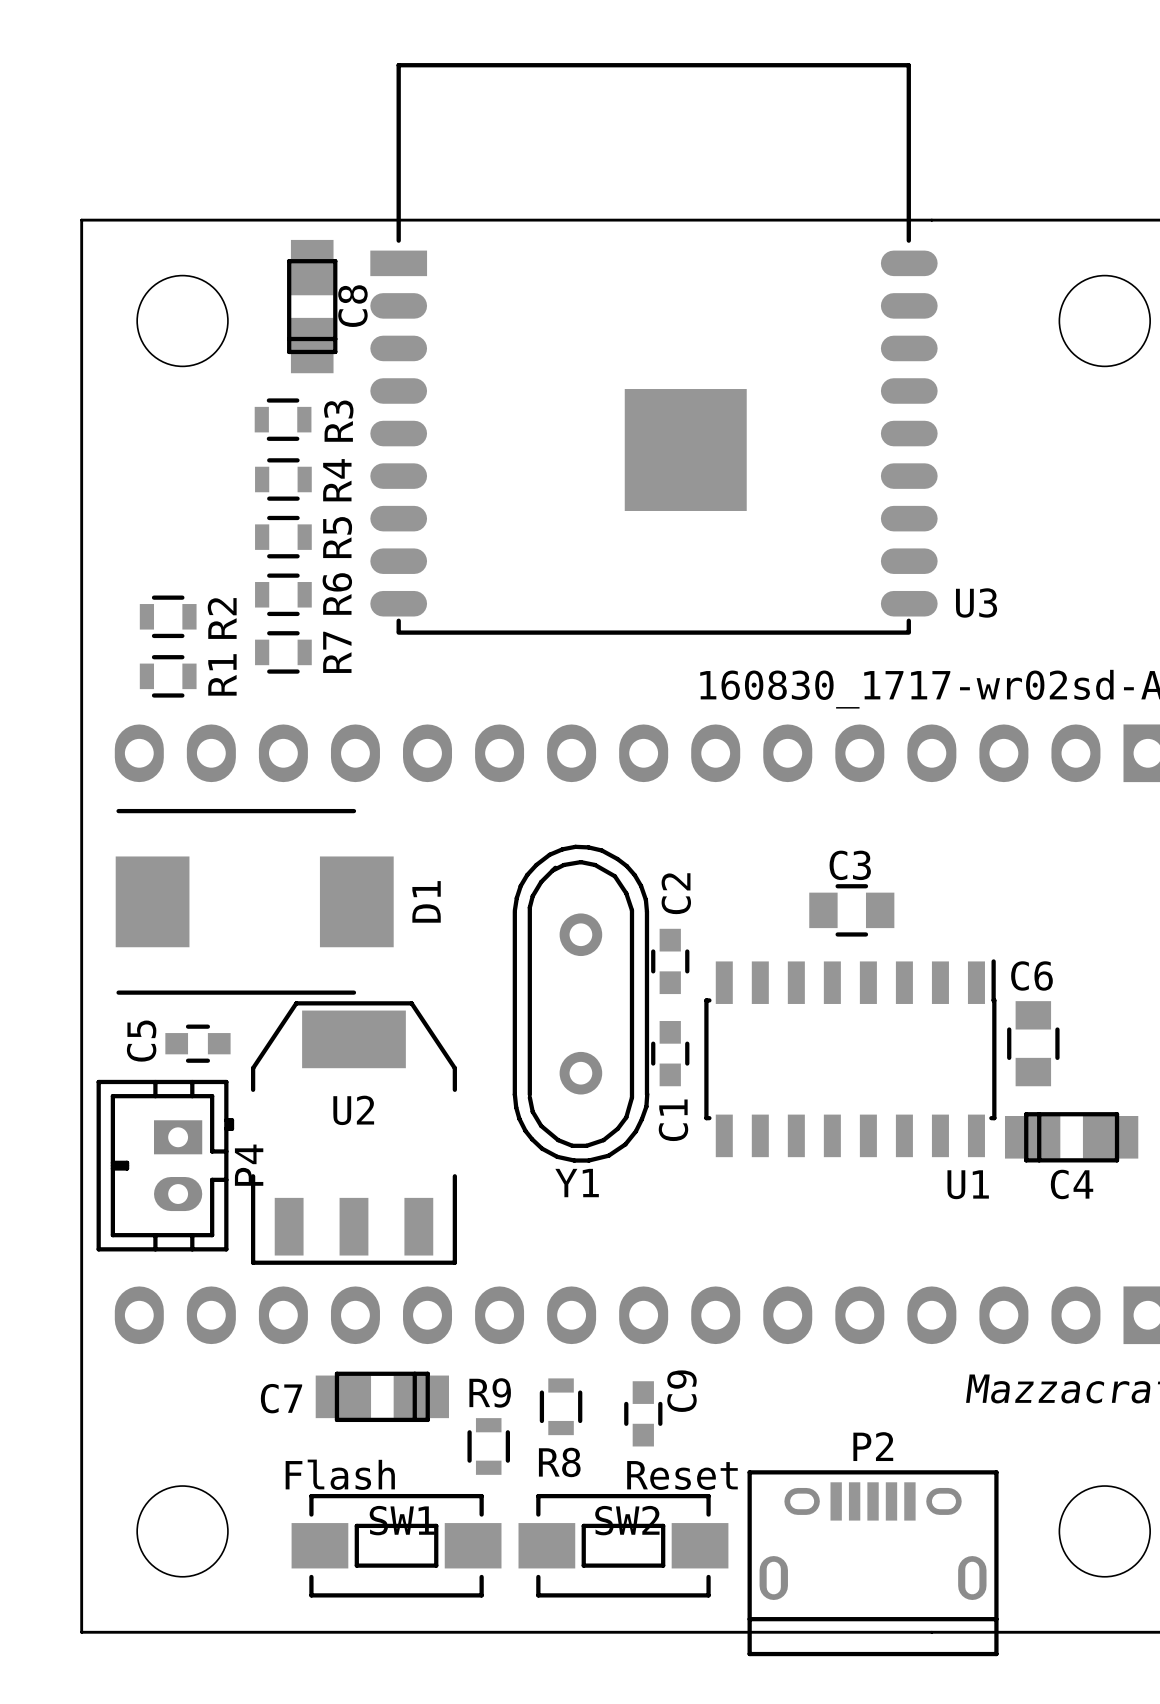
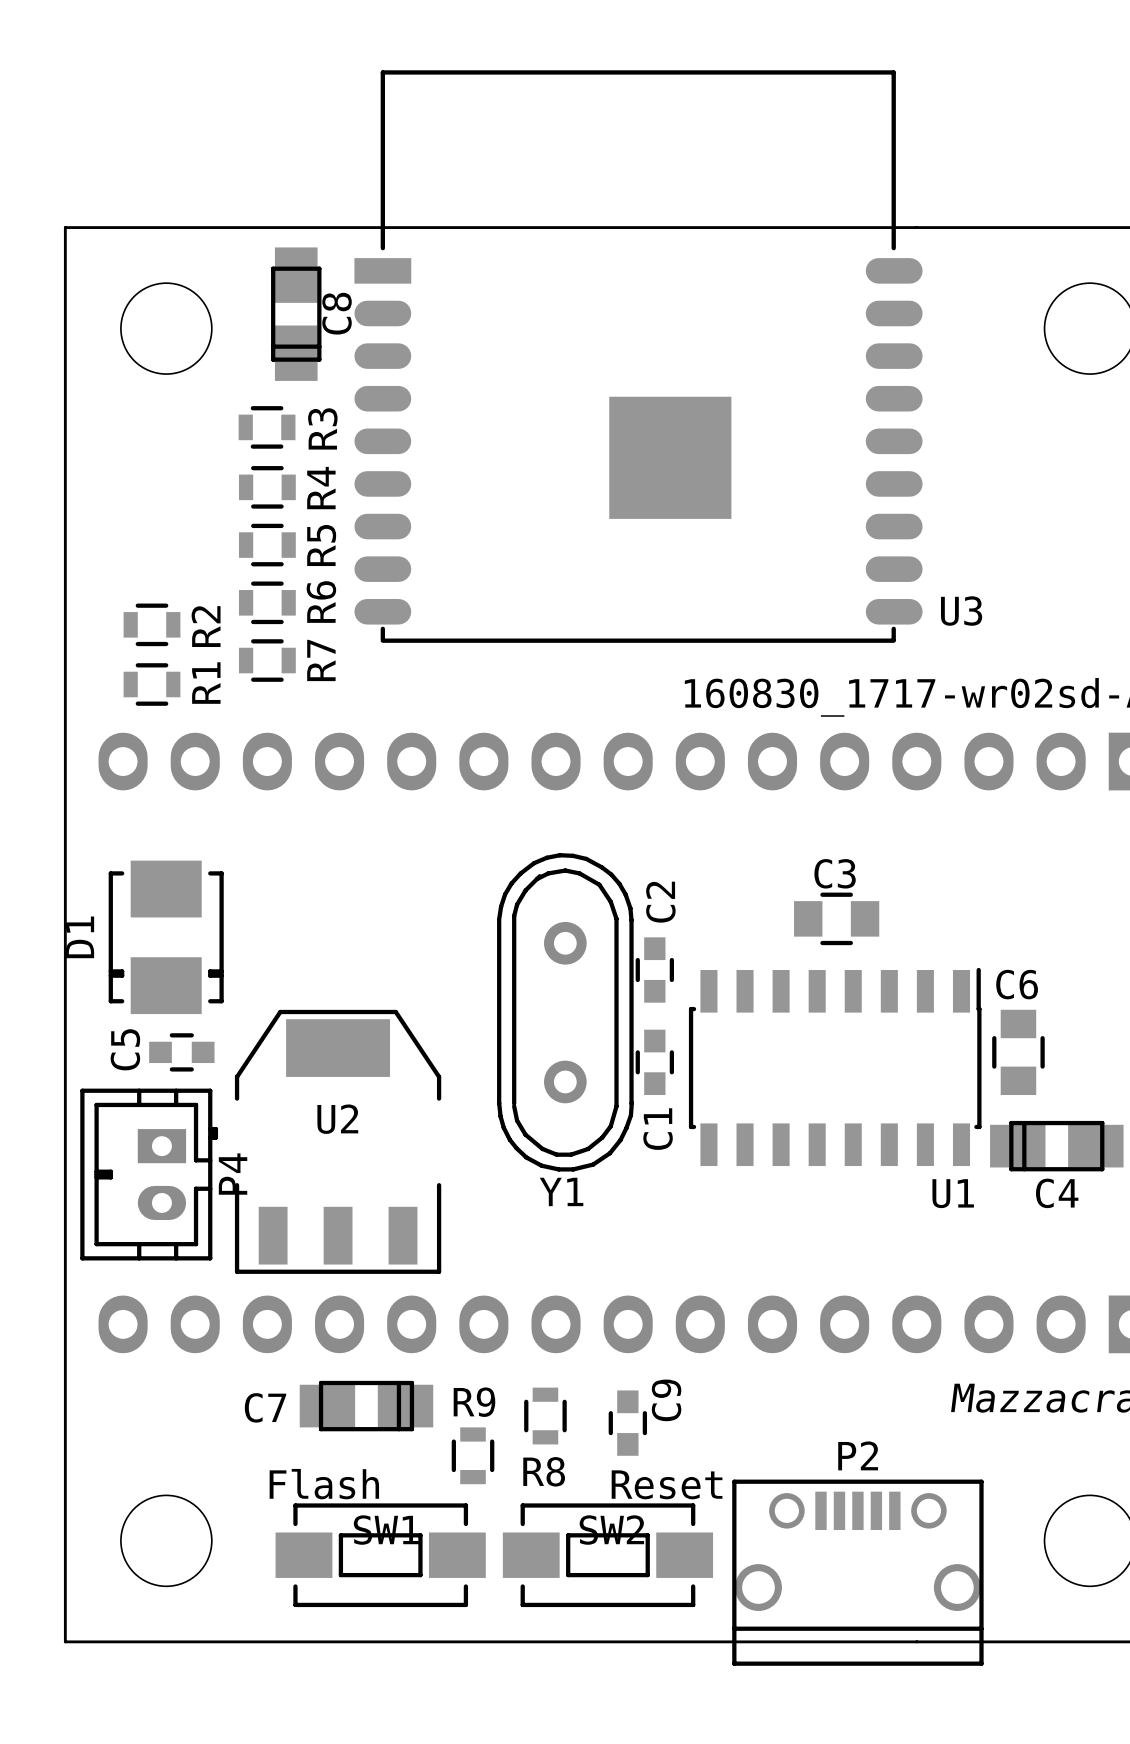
D1 footprint: [115, 808, 394, 995] -> [108, 860, 224, 1015]
D1 name position: D1 (426, 901) -> D1 (79, 937)
P2 footprint: [747, 1470, 999, 1657] -> [732, 1479, 984, 1666]

